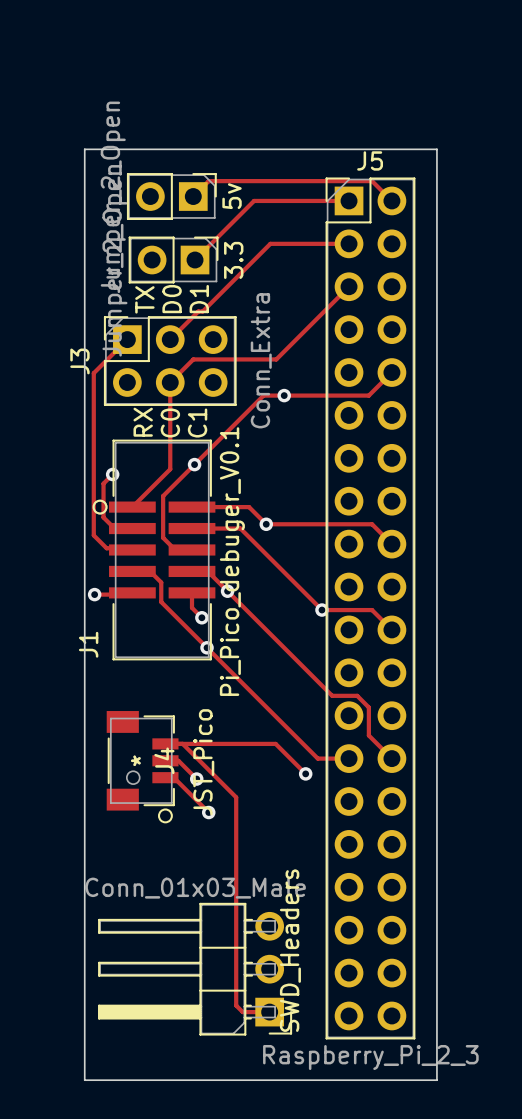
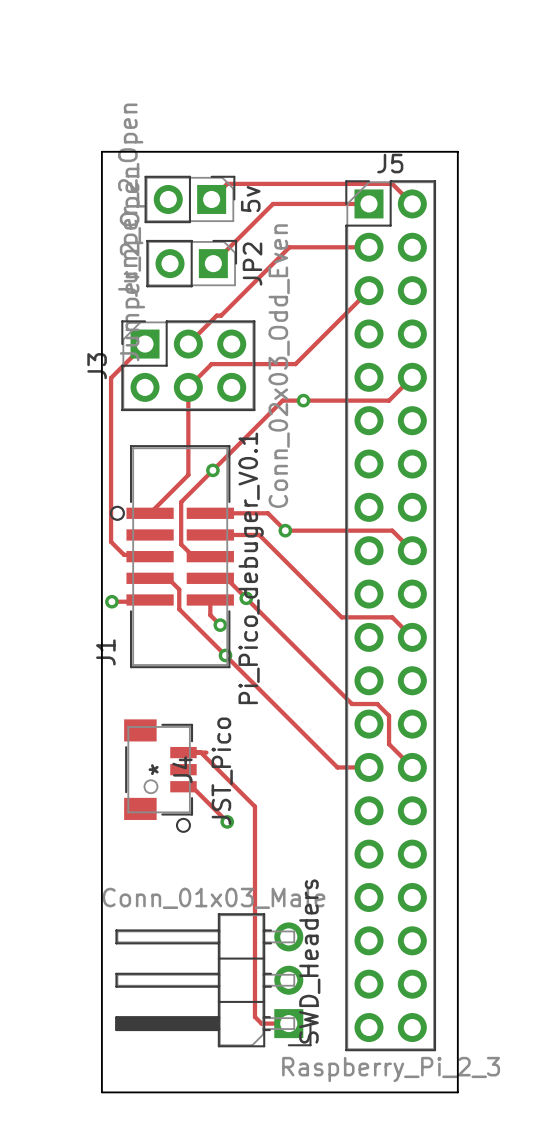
3.3 name: 3.3 (233, 260) -> JP2 (252, 264)
text: TX (144, 299) -> none
text: D0 (172, 299) -> none
text: D1 (199, 299) -> none
J3 value: Conn_Extra (261, 360) -> Conn_02x03_Odd_Even (279, 366)
text: RX (143, 422) -> none
text: C0 (170, 423) -> none
text: C1 (197, 423) -> none
track: (112, 474) (103, 483) (103, 517) (114, 528) (132, 528) -> none
via: (112, 474) -> none
via: (321, 610) -> none
track: (188, 743) (275, 743) (305, 773) -> none
track: (165, 760) (178, 760) (196, 779) -> none
via: (305, 773) -> none
via: (196, 779) -> none

